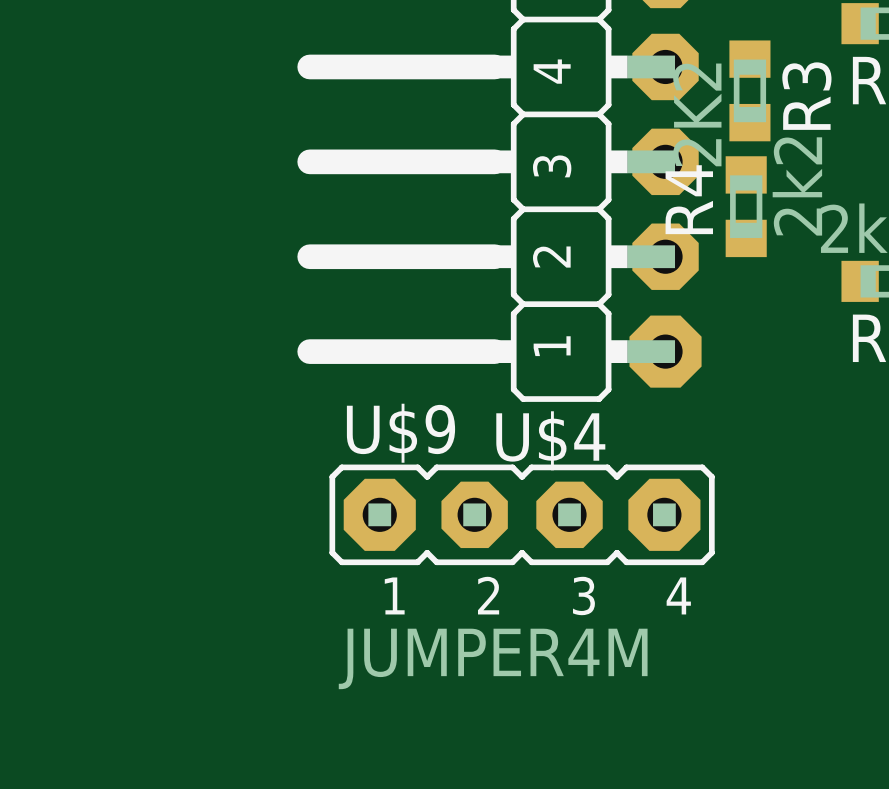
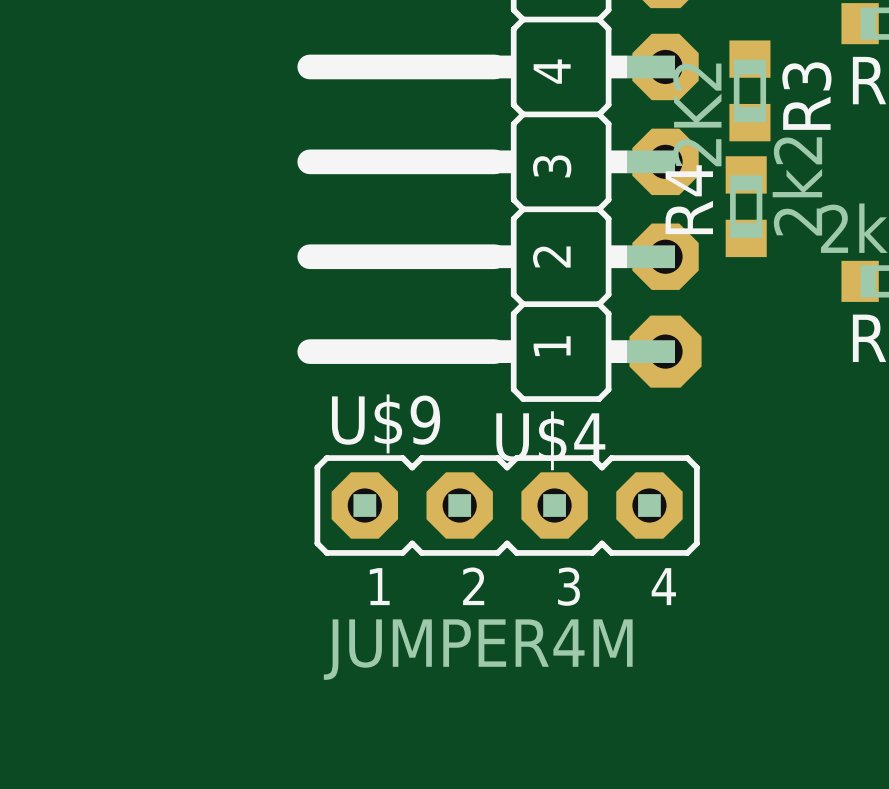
U$9 footprint: [329, 464, 715, 566] -> [314, 455, 700, 556]

